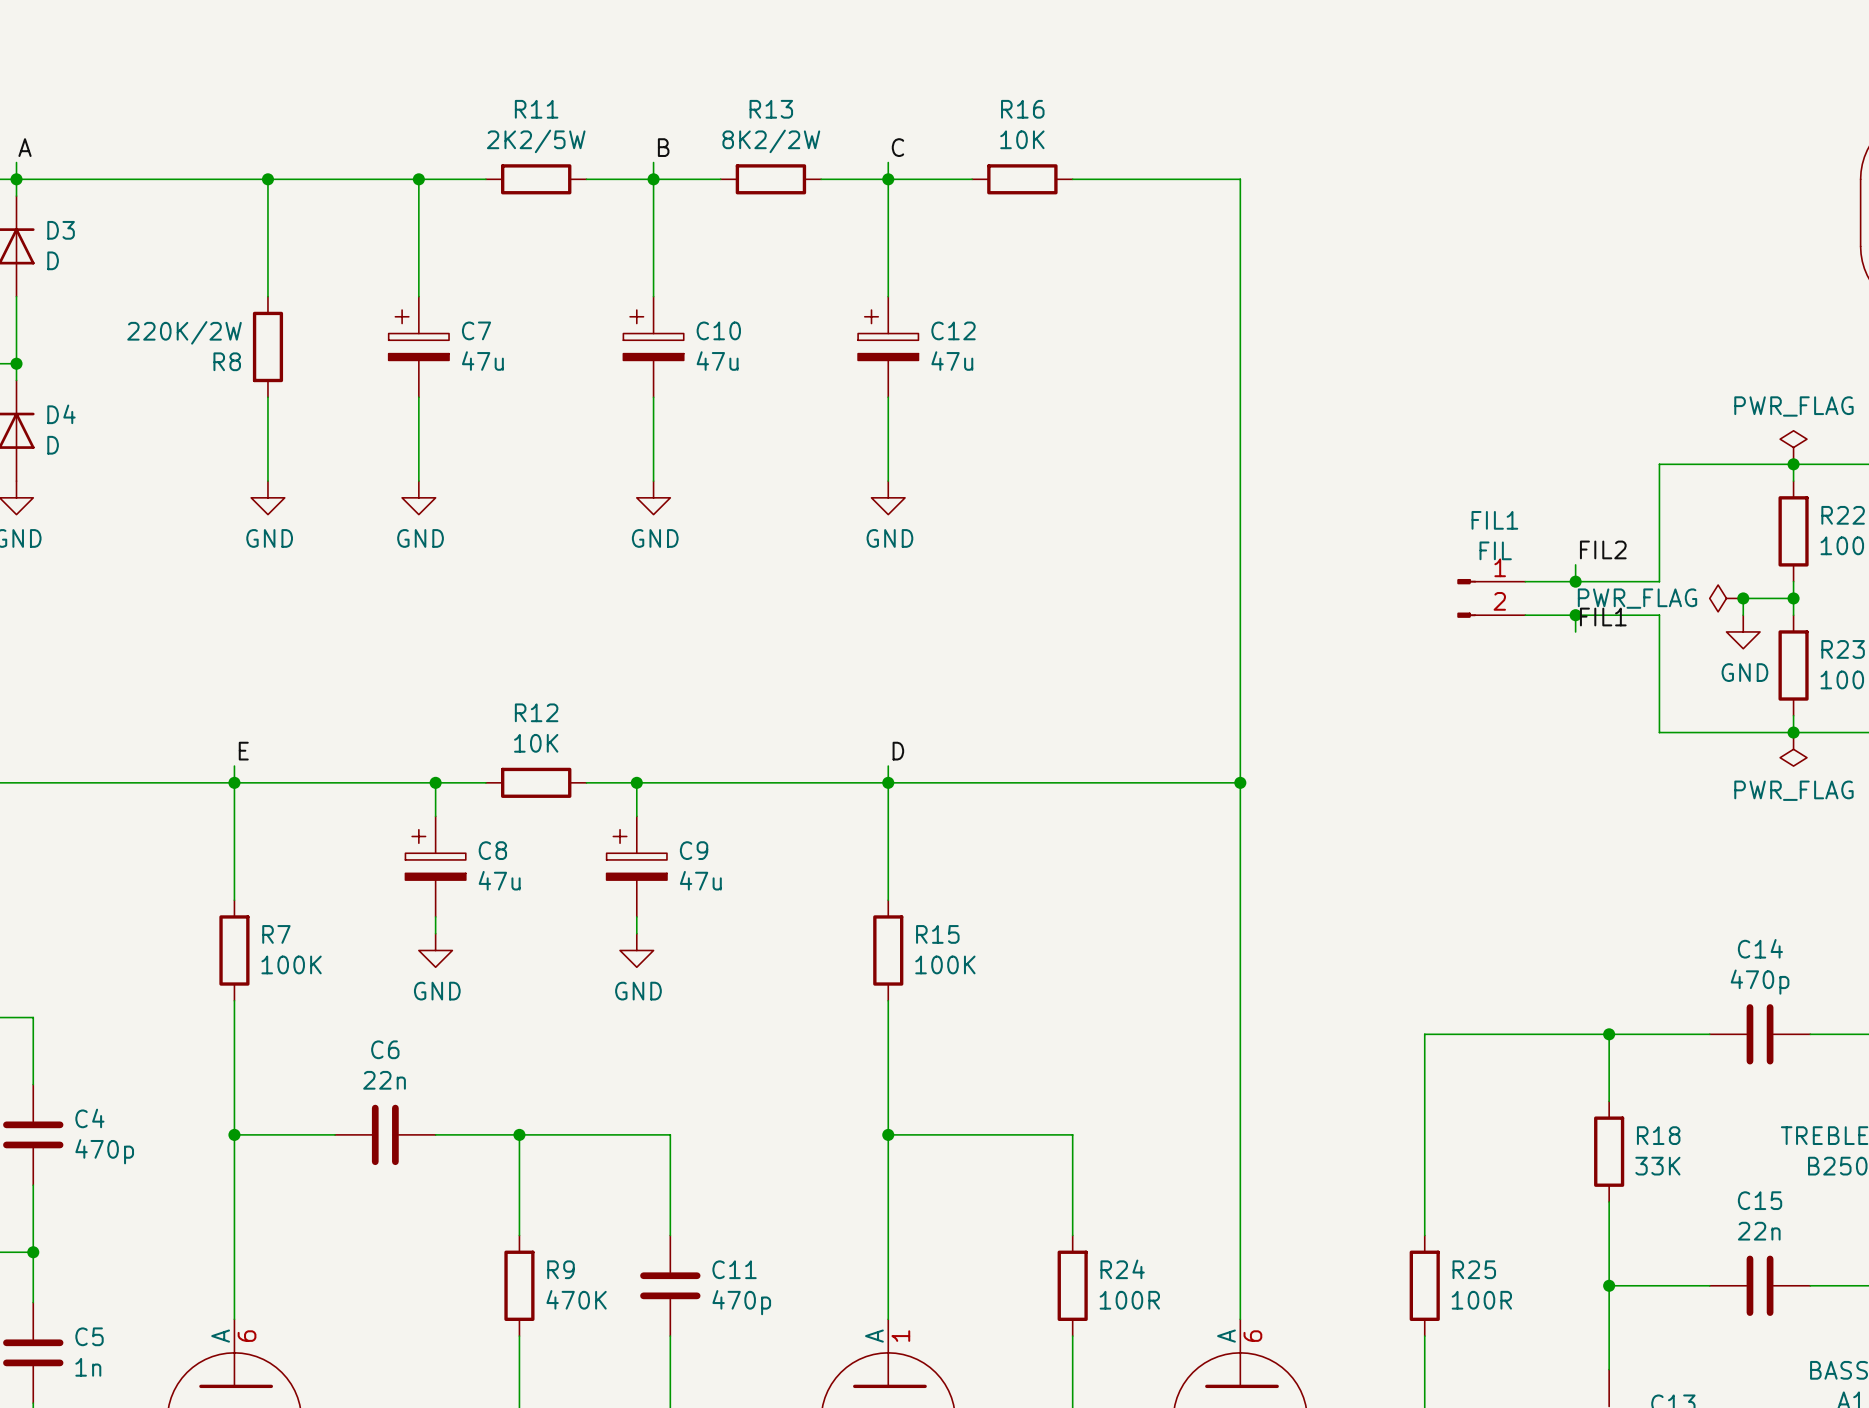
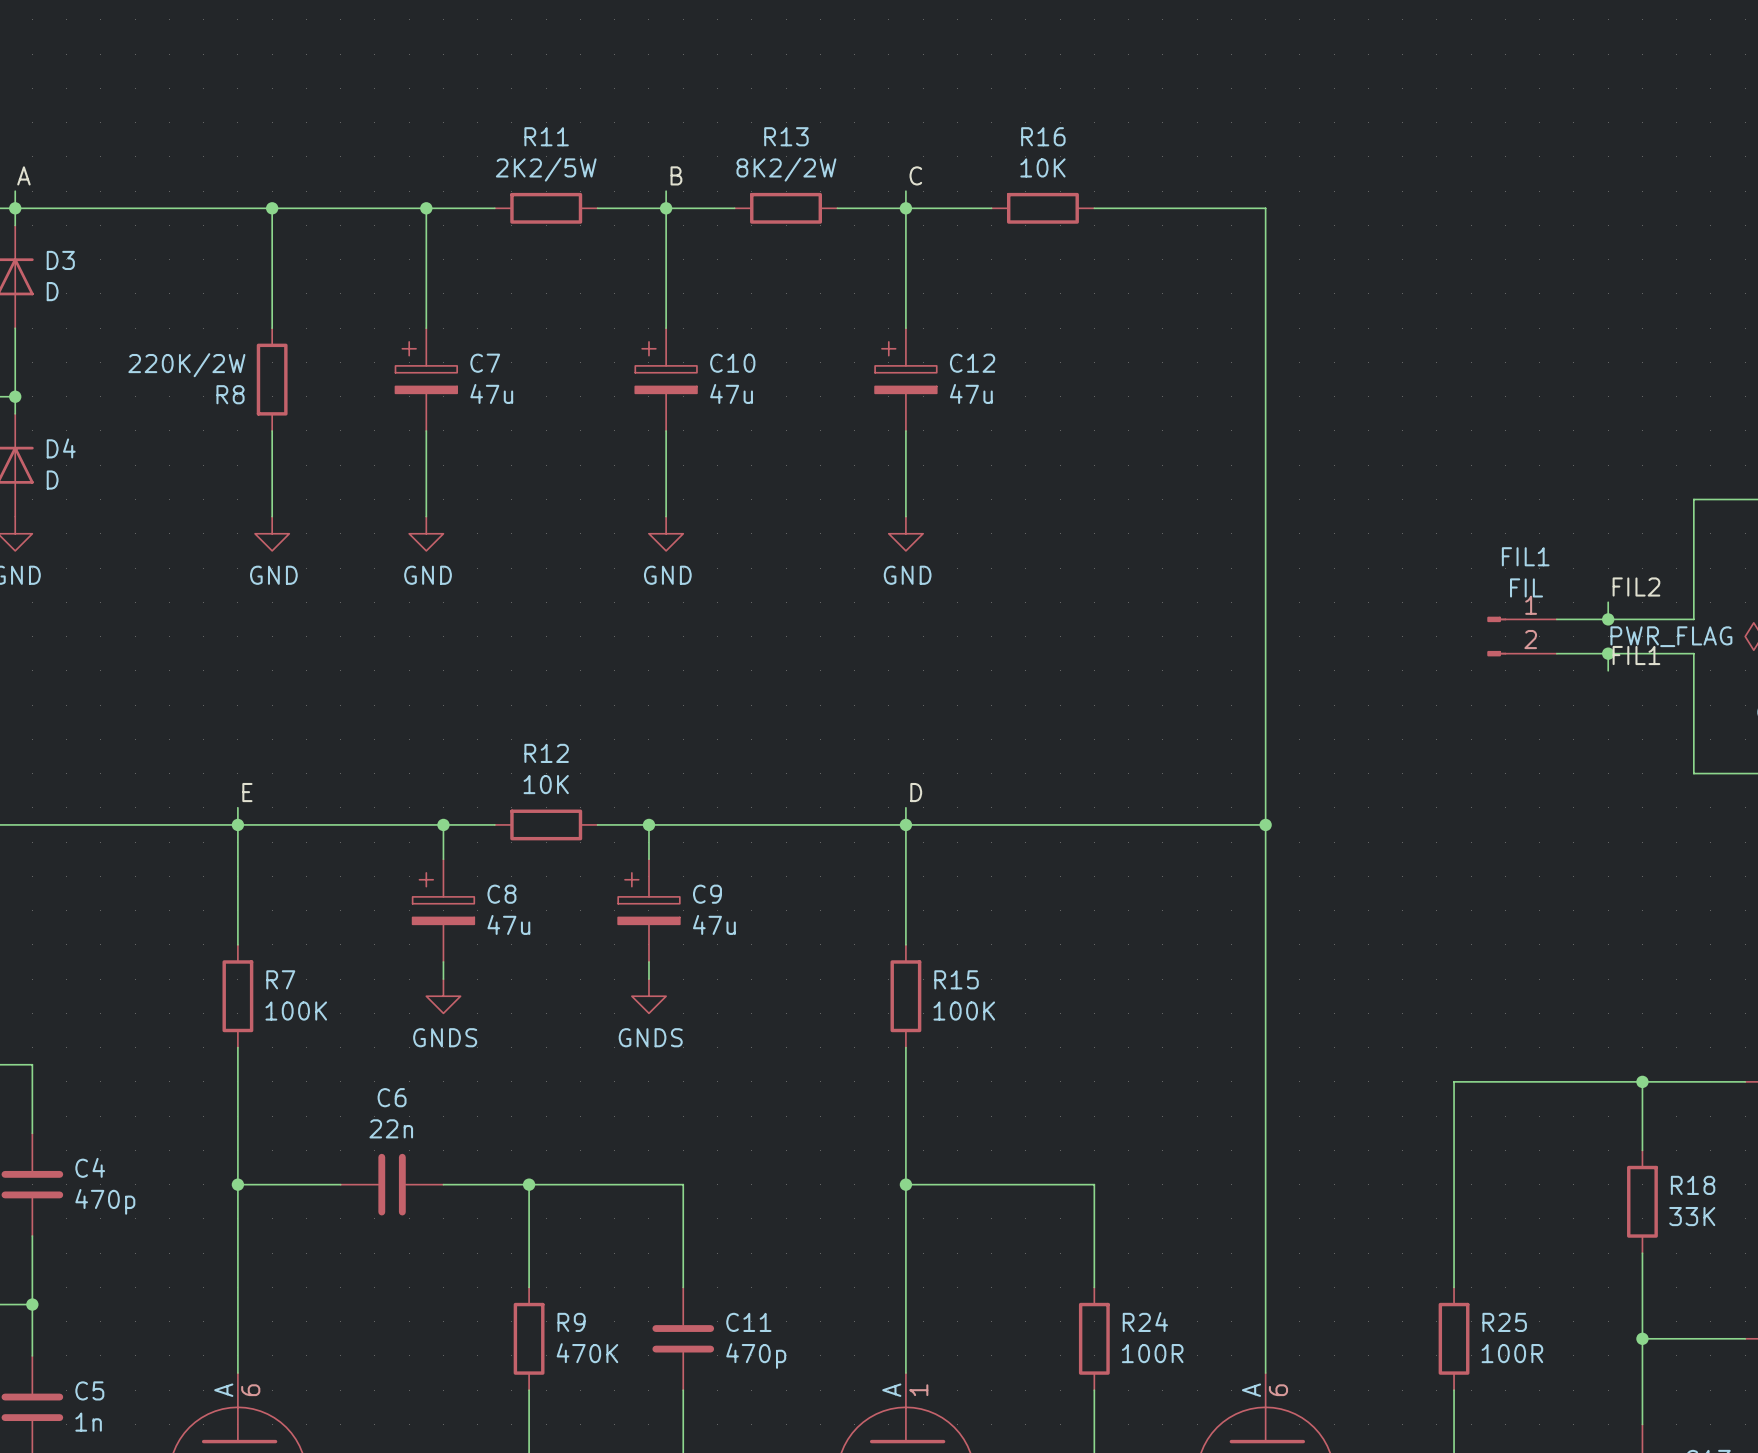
power symbol: GND (435, 950) -> GNDS (443, 996)
power symbol: GND (636, 950) -> GNDS (648, 996)

